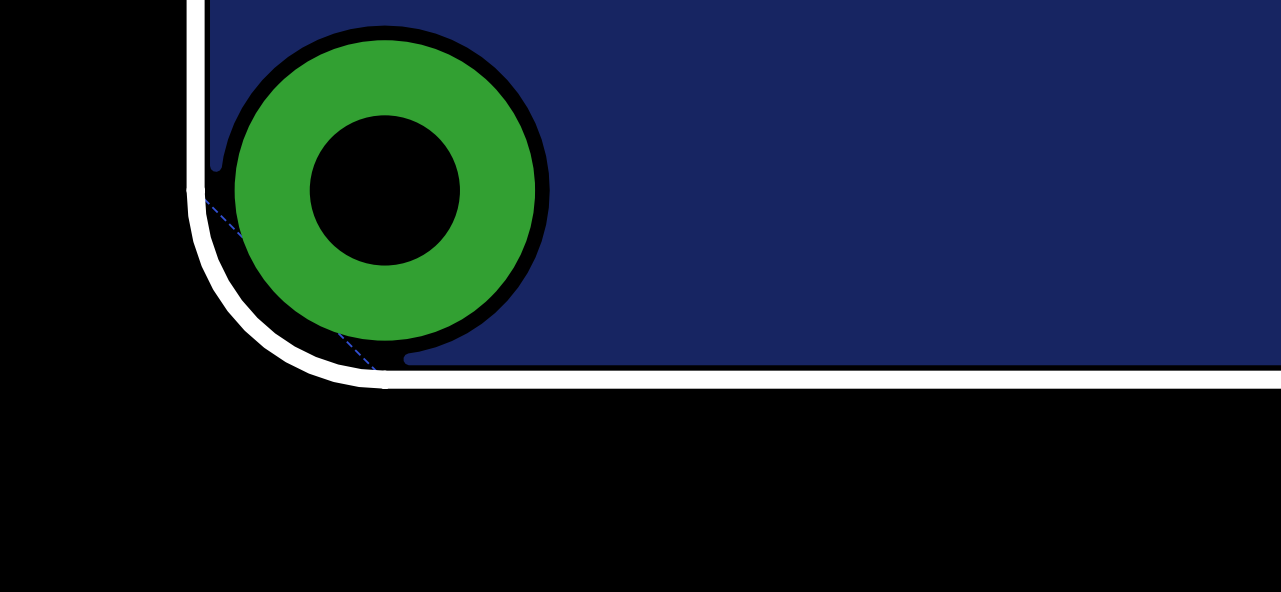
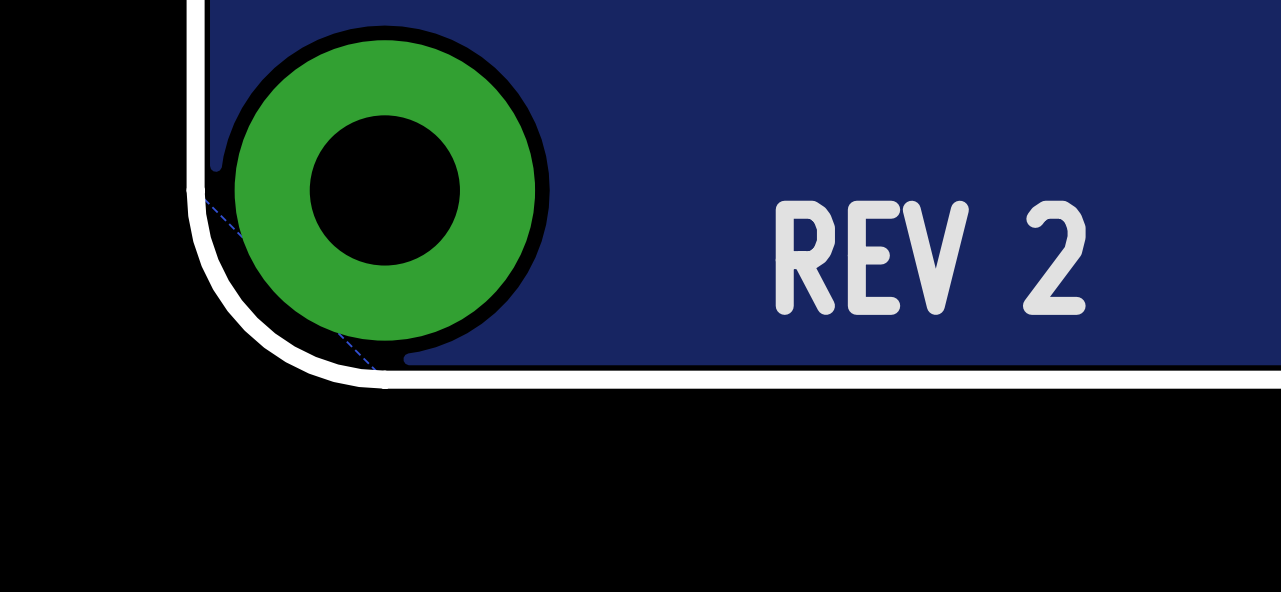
text: none -> REV 2 (930, 257)

